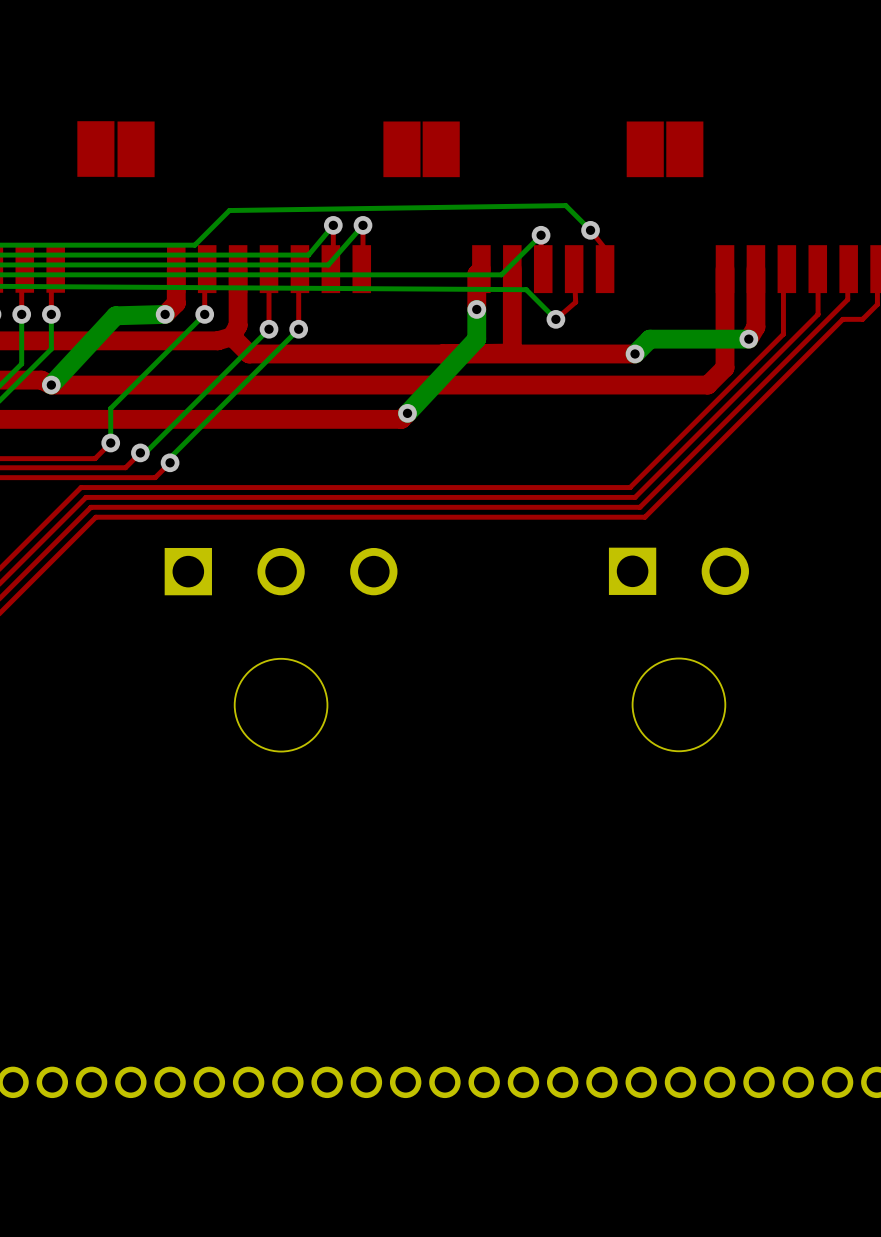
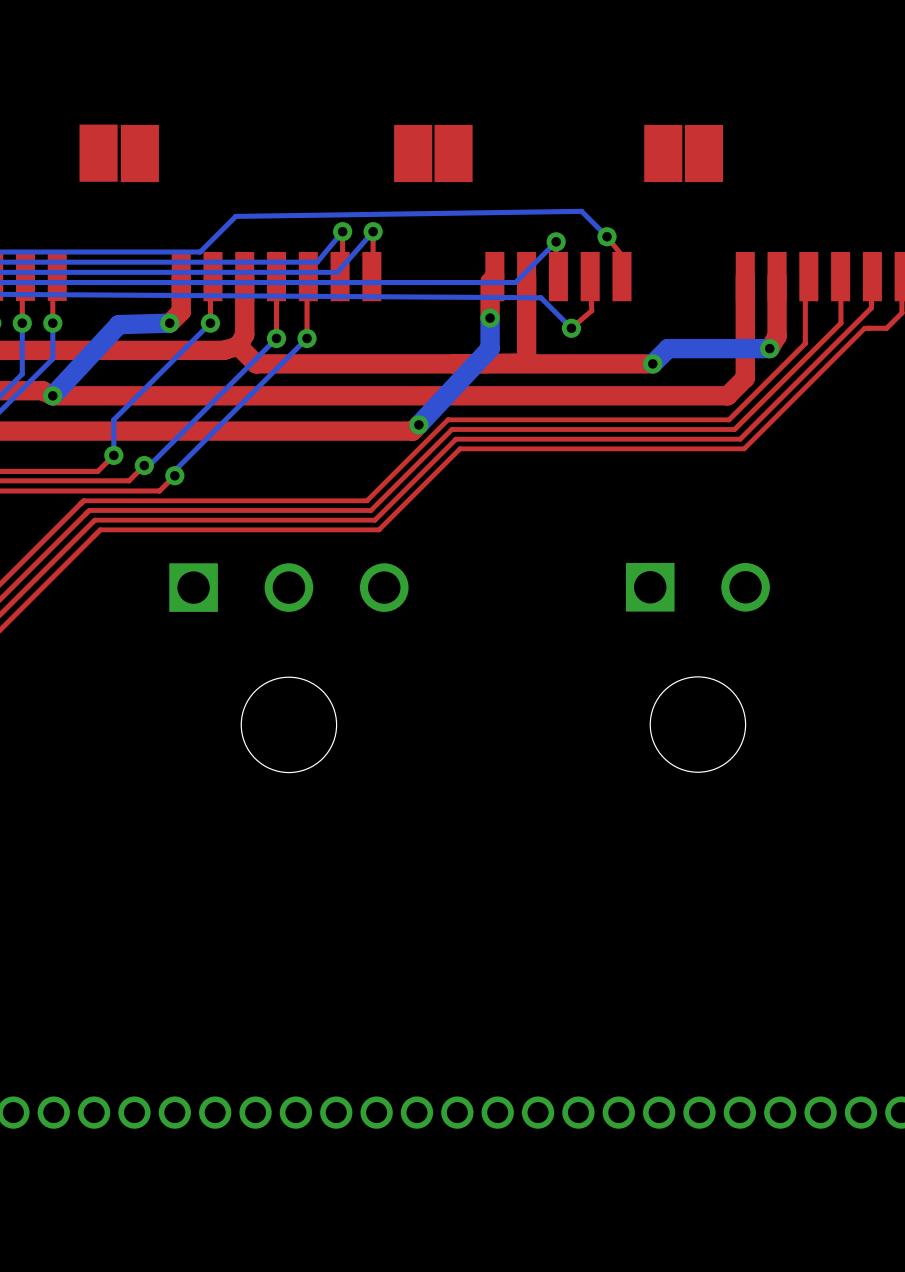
top track: (842, 319) (644, 517) (95, 517) -> none
top track: none -> (871, 328) (864, 328) (744, 448) (459, 448) (379, 529) (100, 529) (93, 536)
top track: (709, 408) (630, 487) (81, 487) -> (729, 419) (447, 419) (366, 500) (83, 500) (80, 503)
top track: (714, 417) (635, 497) (85, 497) -> (734, 429) (451, 429) (370, 510) (89, 510) (85, 513)
top track: (720, 427) (640, 507) (90, 507) -> (740, 439) (455, 439) (374, 520) (93, 521)

